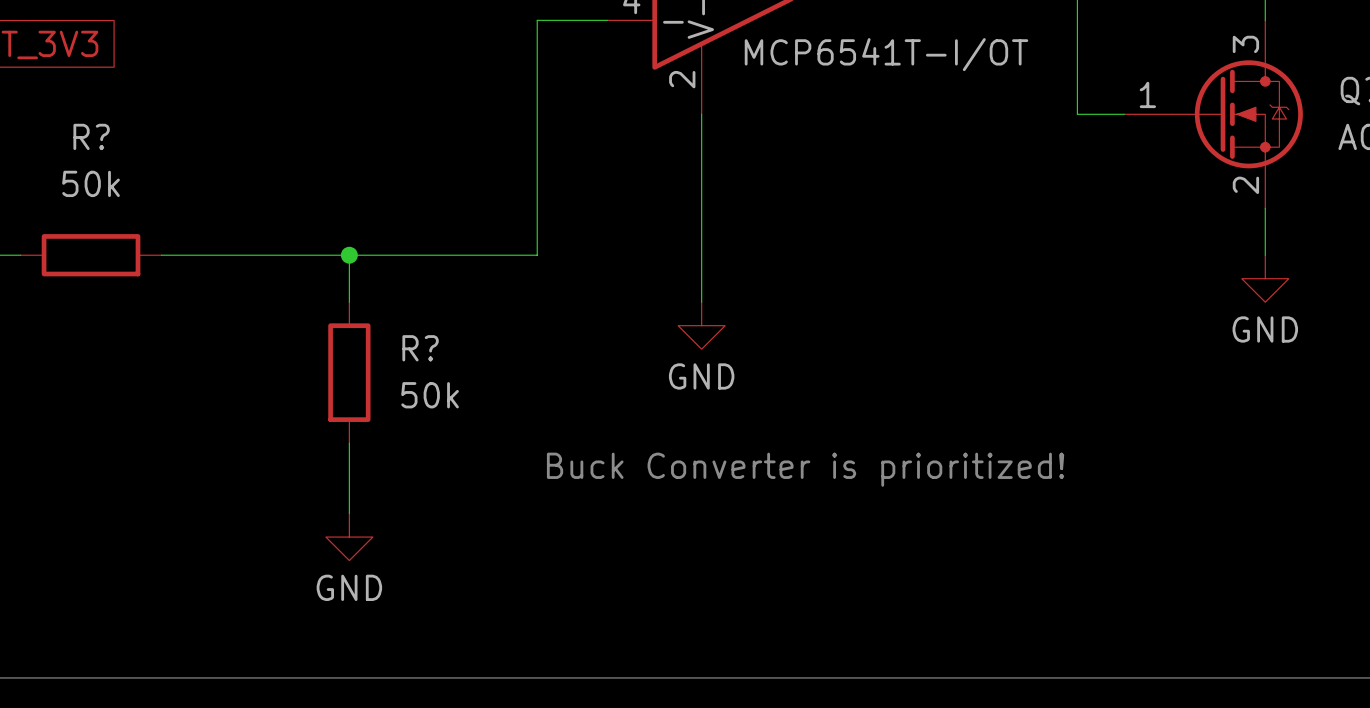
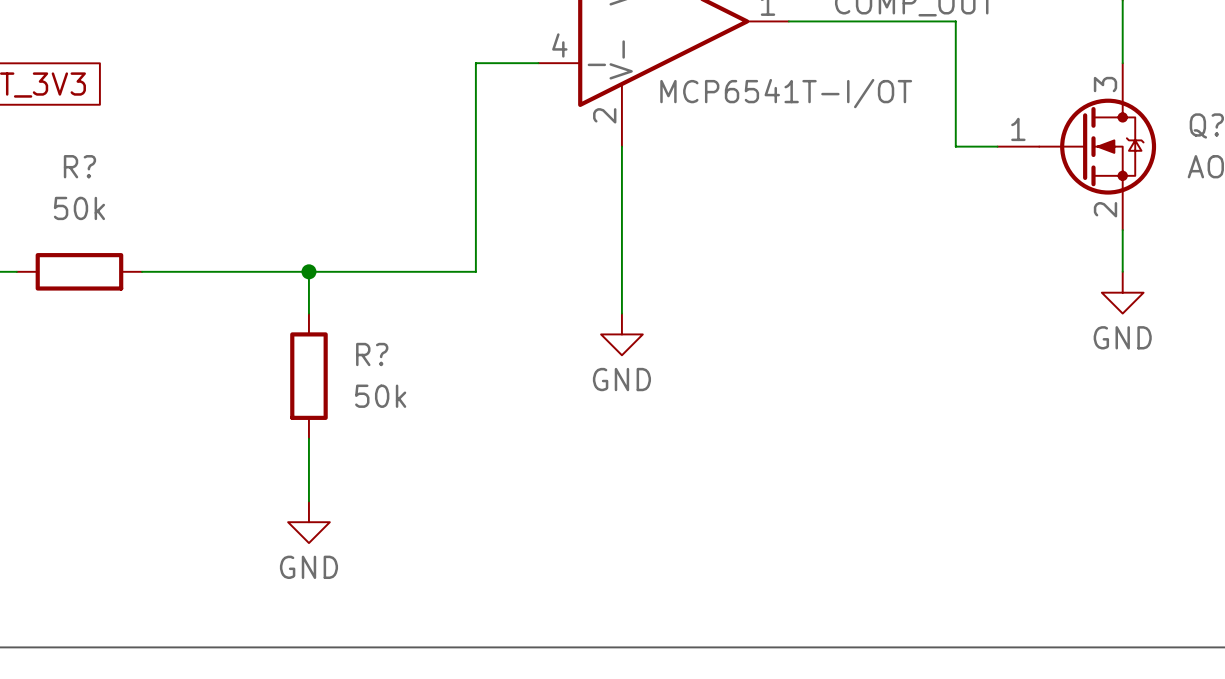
text: Buck Converter is prioritized! (805, 469) -> none

